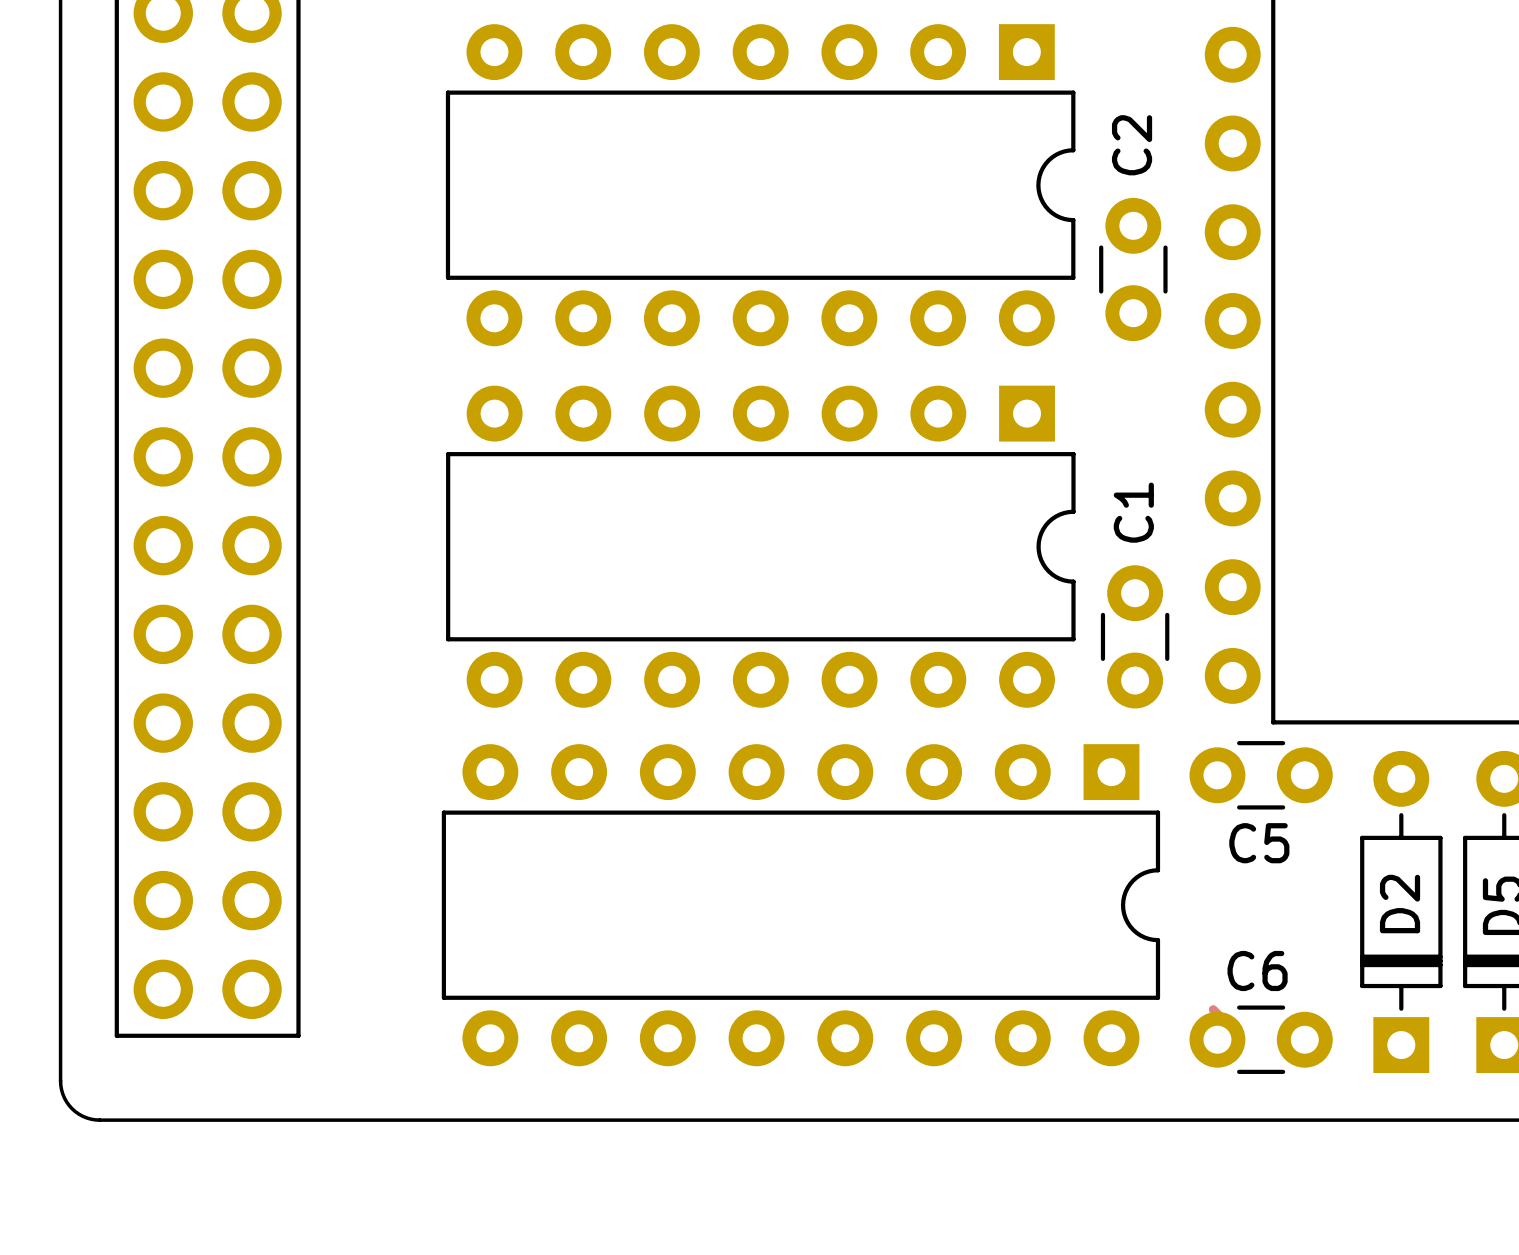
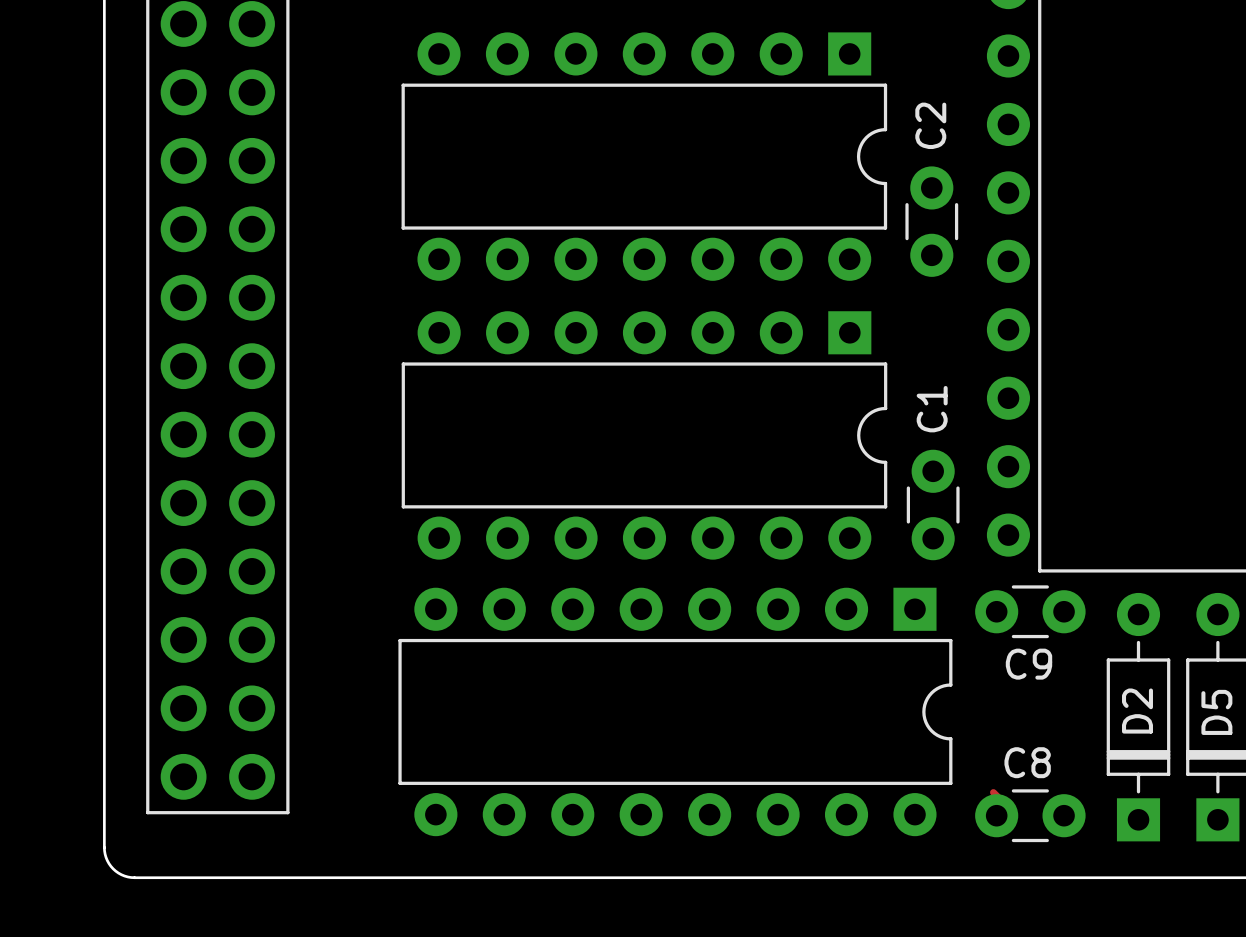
C5 name: C5 (1259, 843) -> C9 (1028, 664)
C6 name: C6 (1257, 970) -> C8 (1027, 762)

